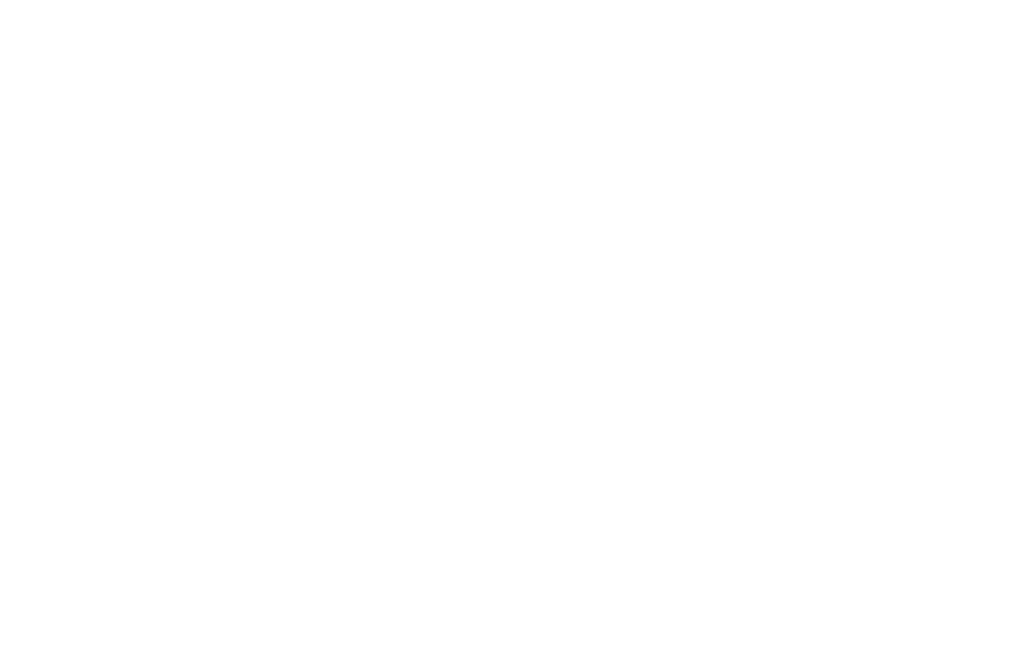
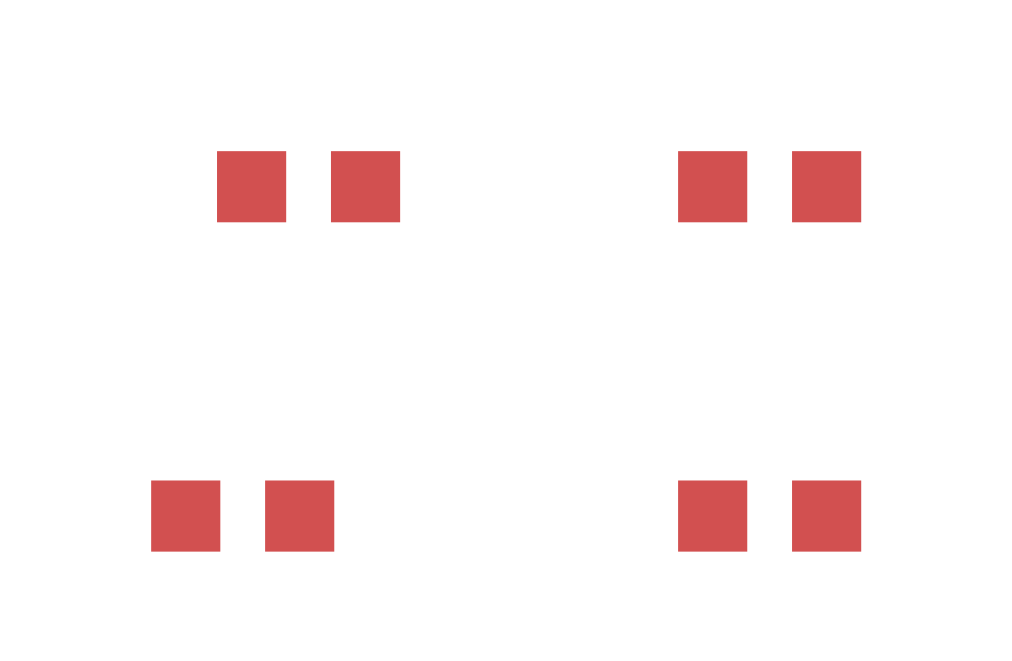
part: none -> (308, 186)
part: none -> (769, 186)
part: none -> (242, 516)
part: none -> (769, 516)

